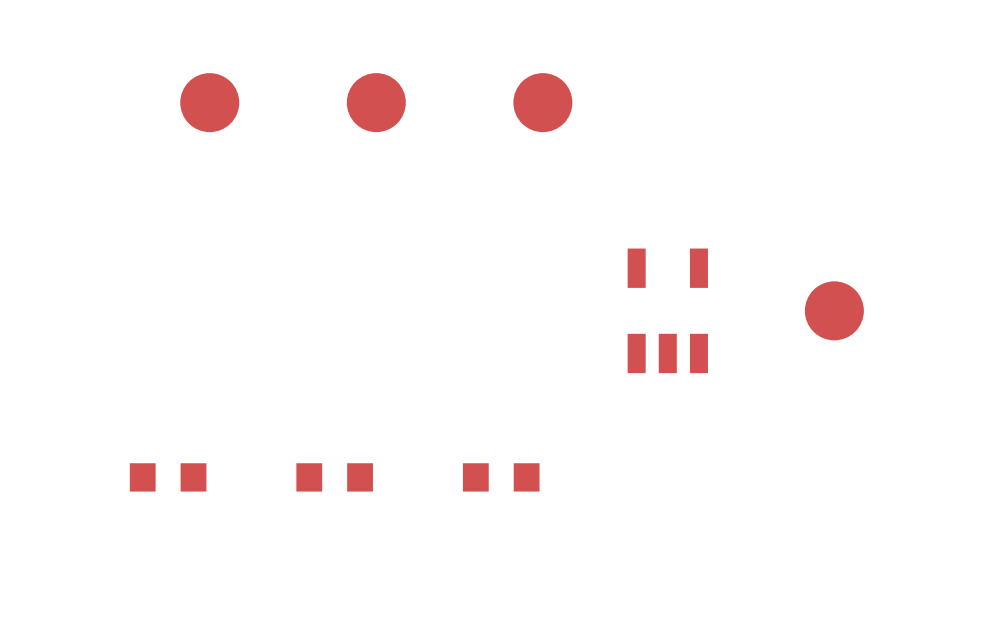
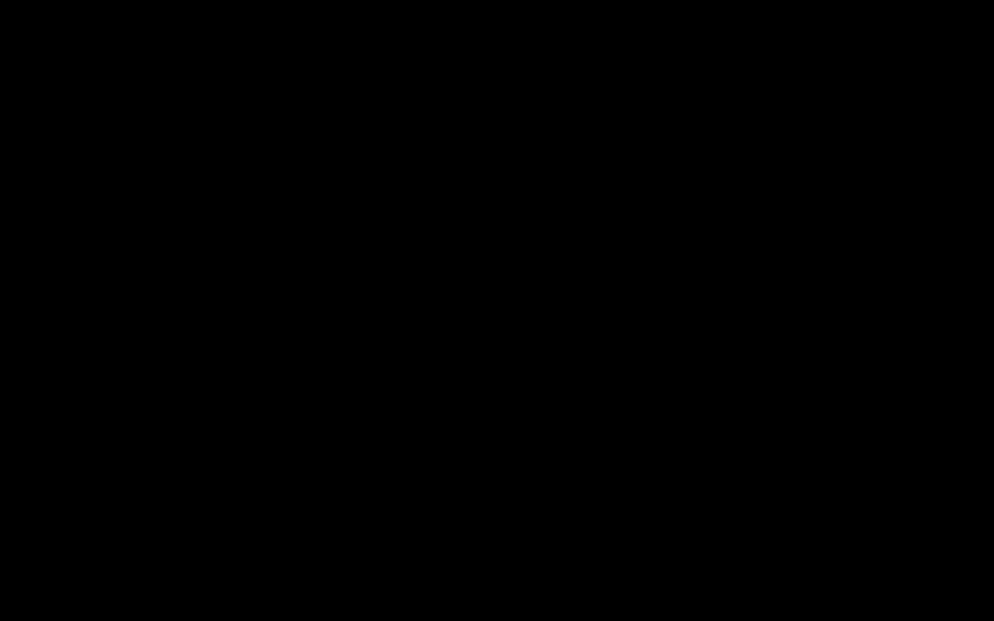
part: (209, 102) -> none
part: (376, 102) -> none
part: (542, 102) -> none
part: (667, 310) -> none
part: (834, 310) -> none
part: (168, 477) -> none
part: (334, 477) -> none
part: (501, 477) -> none

